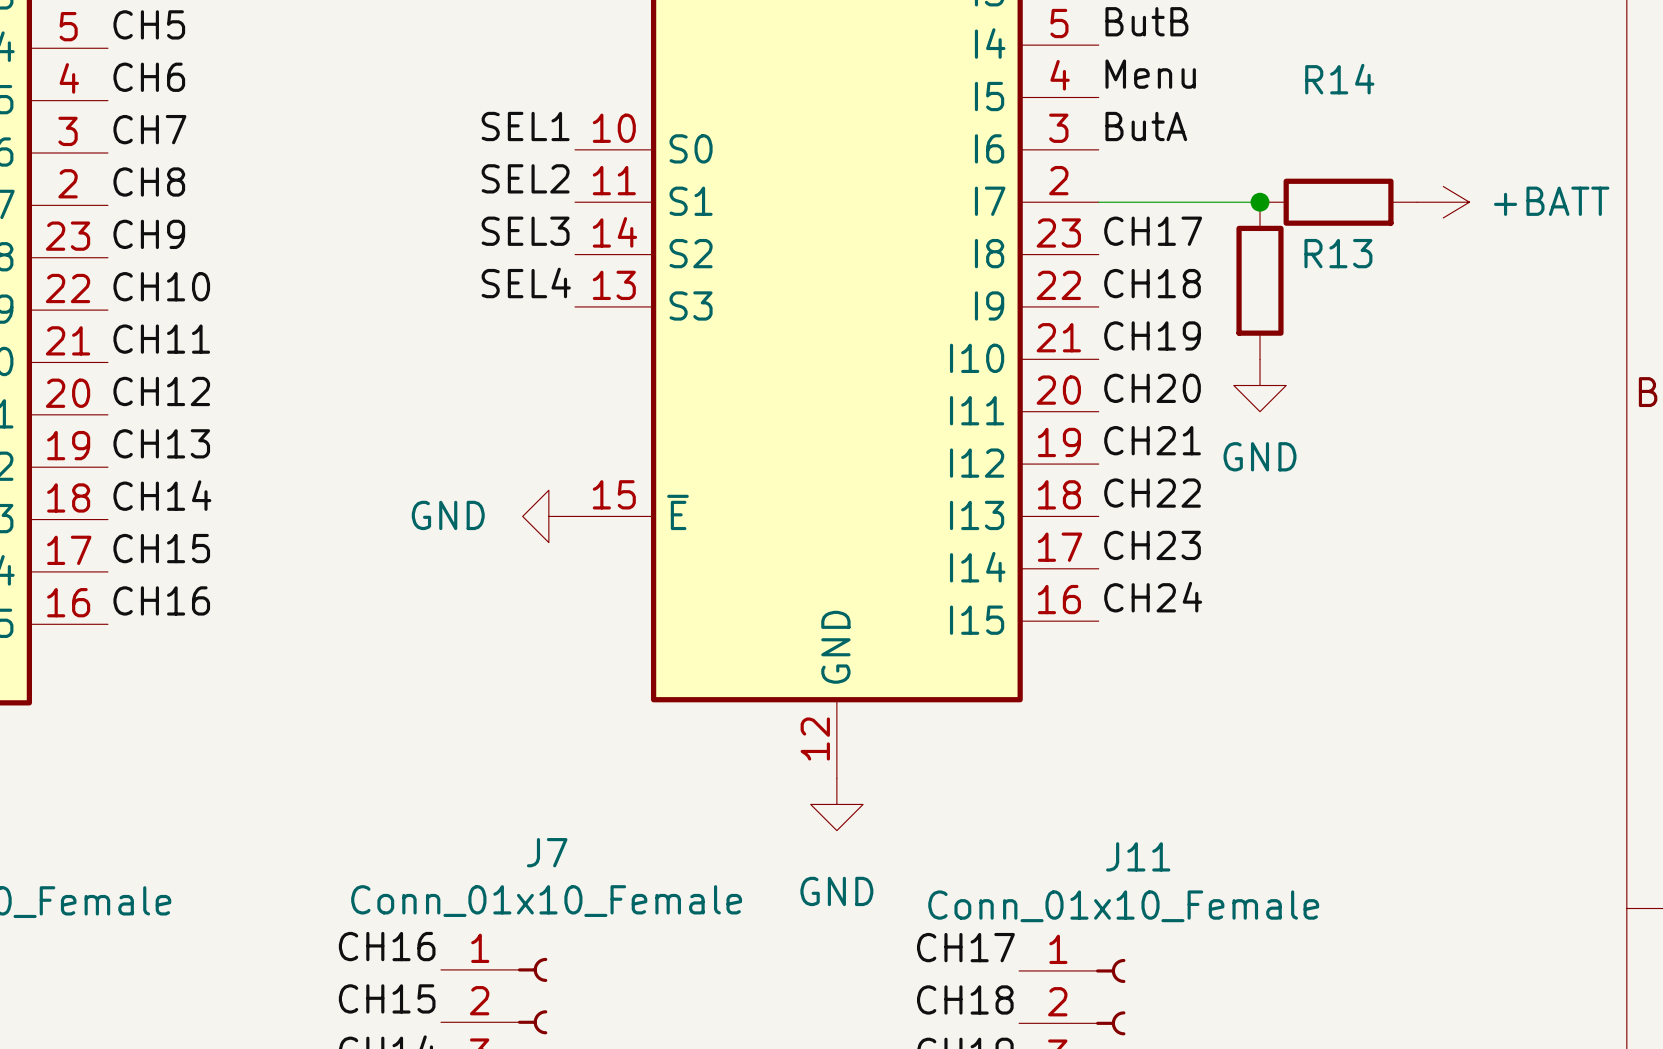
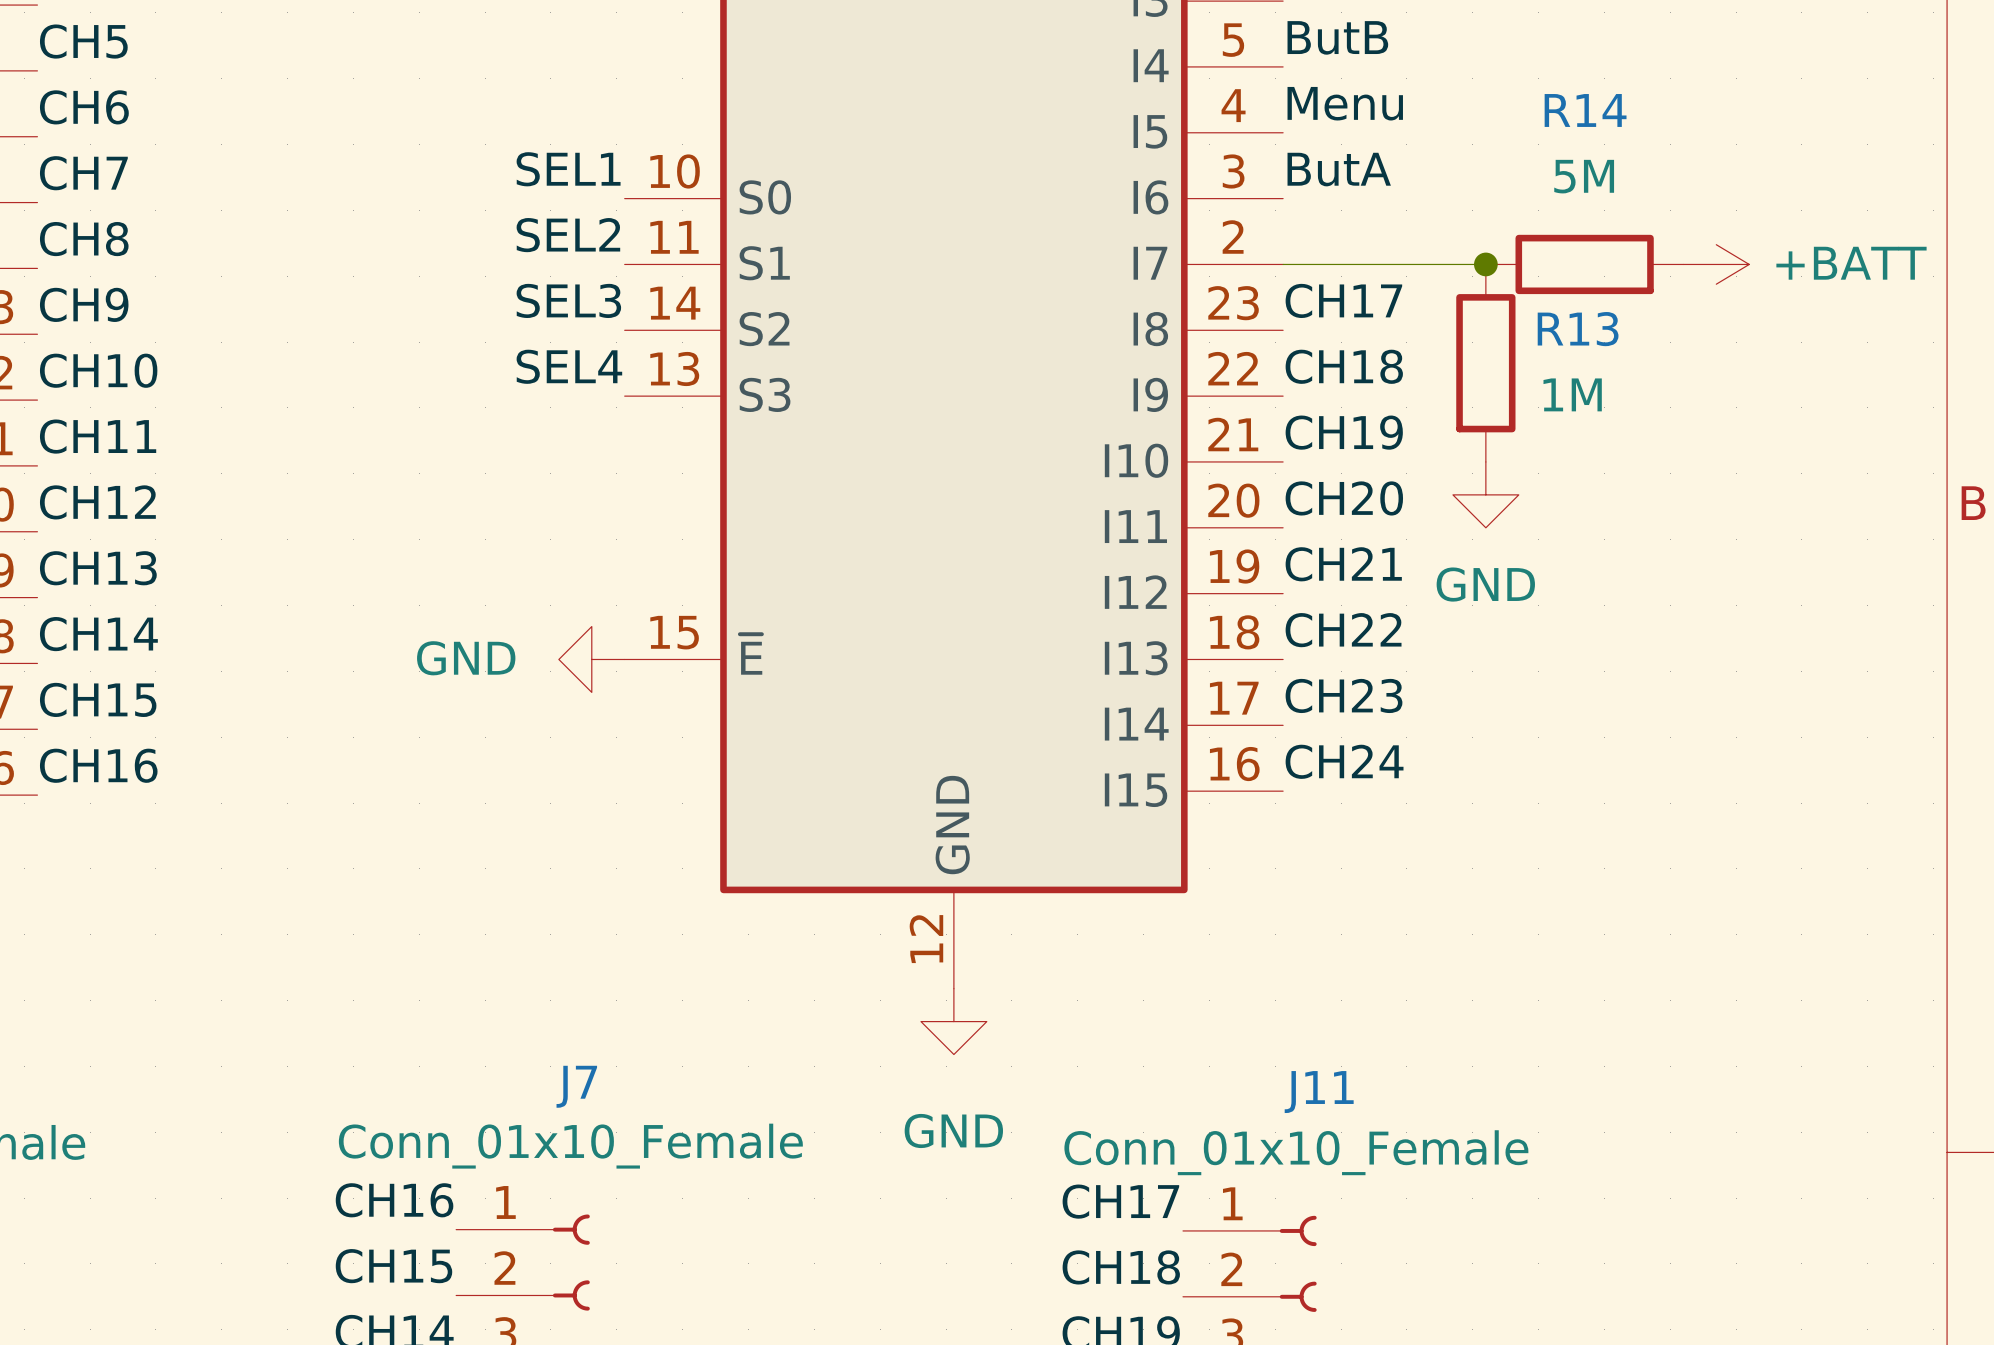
R14 value: none -> 5M (1584, 176)
R13 value: none -> 1M (1572, 394)

